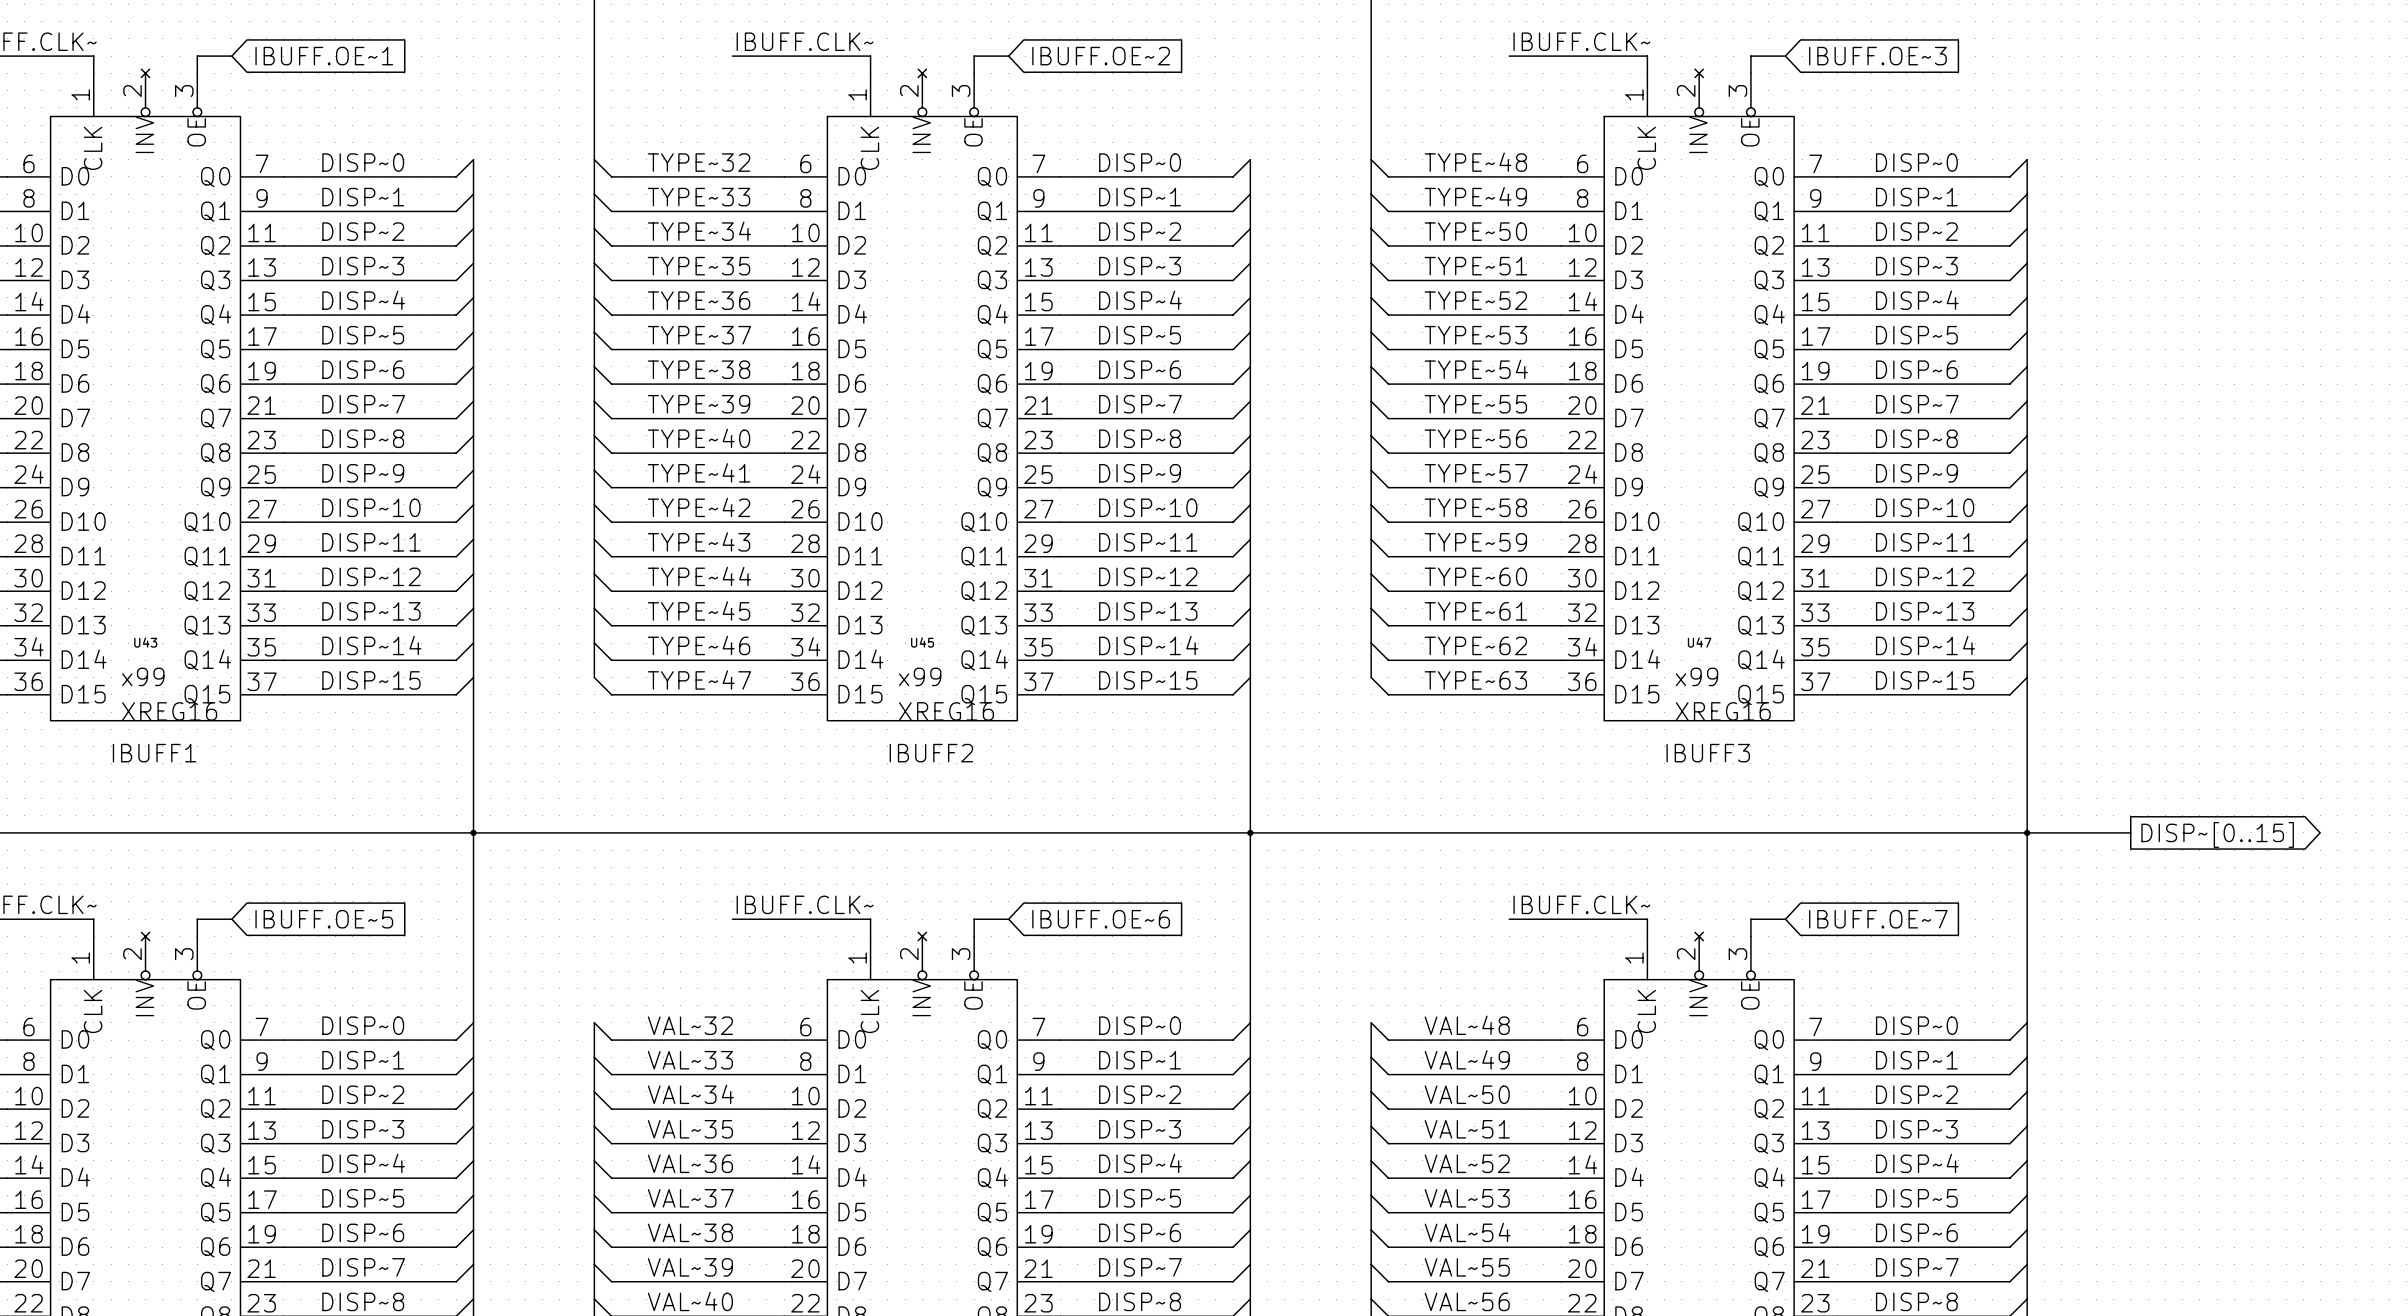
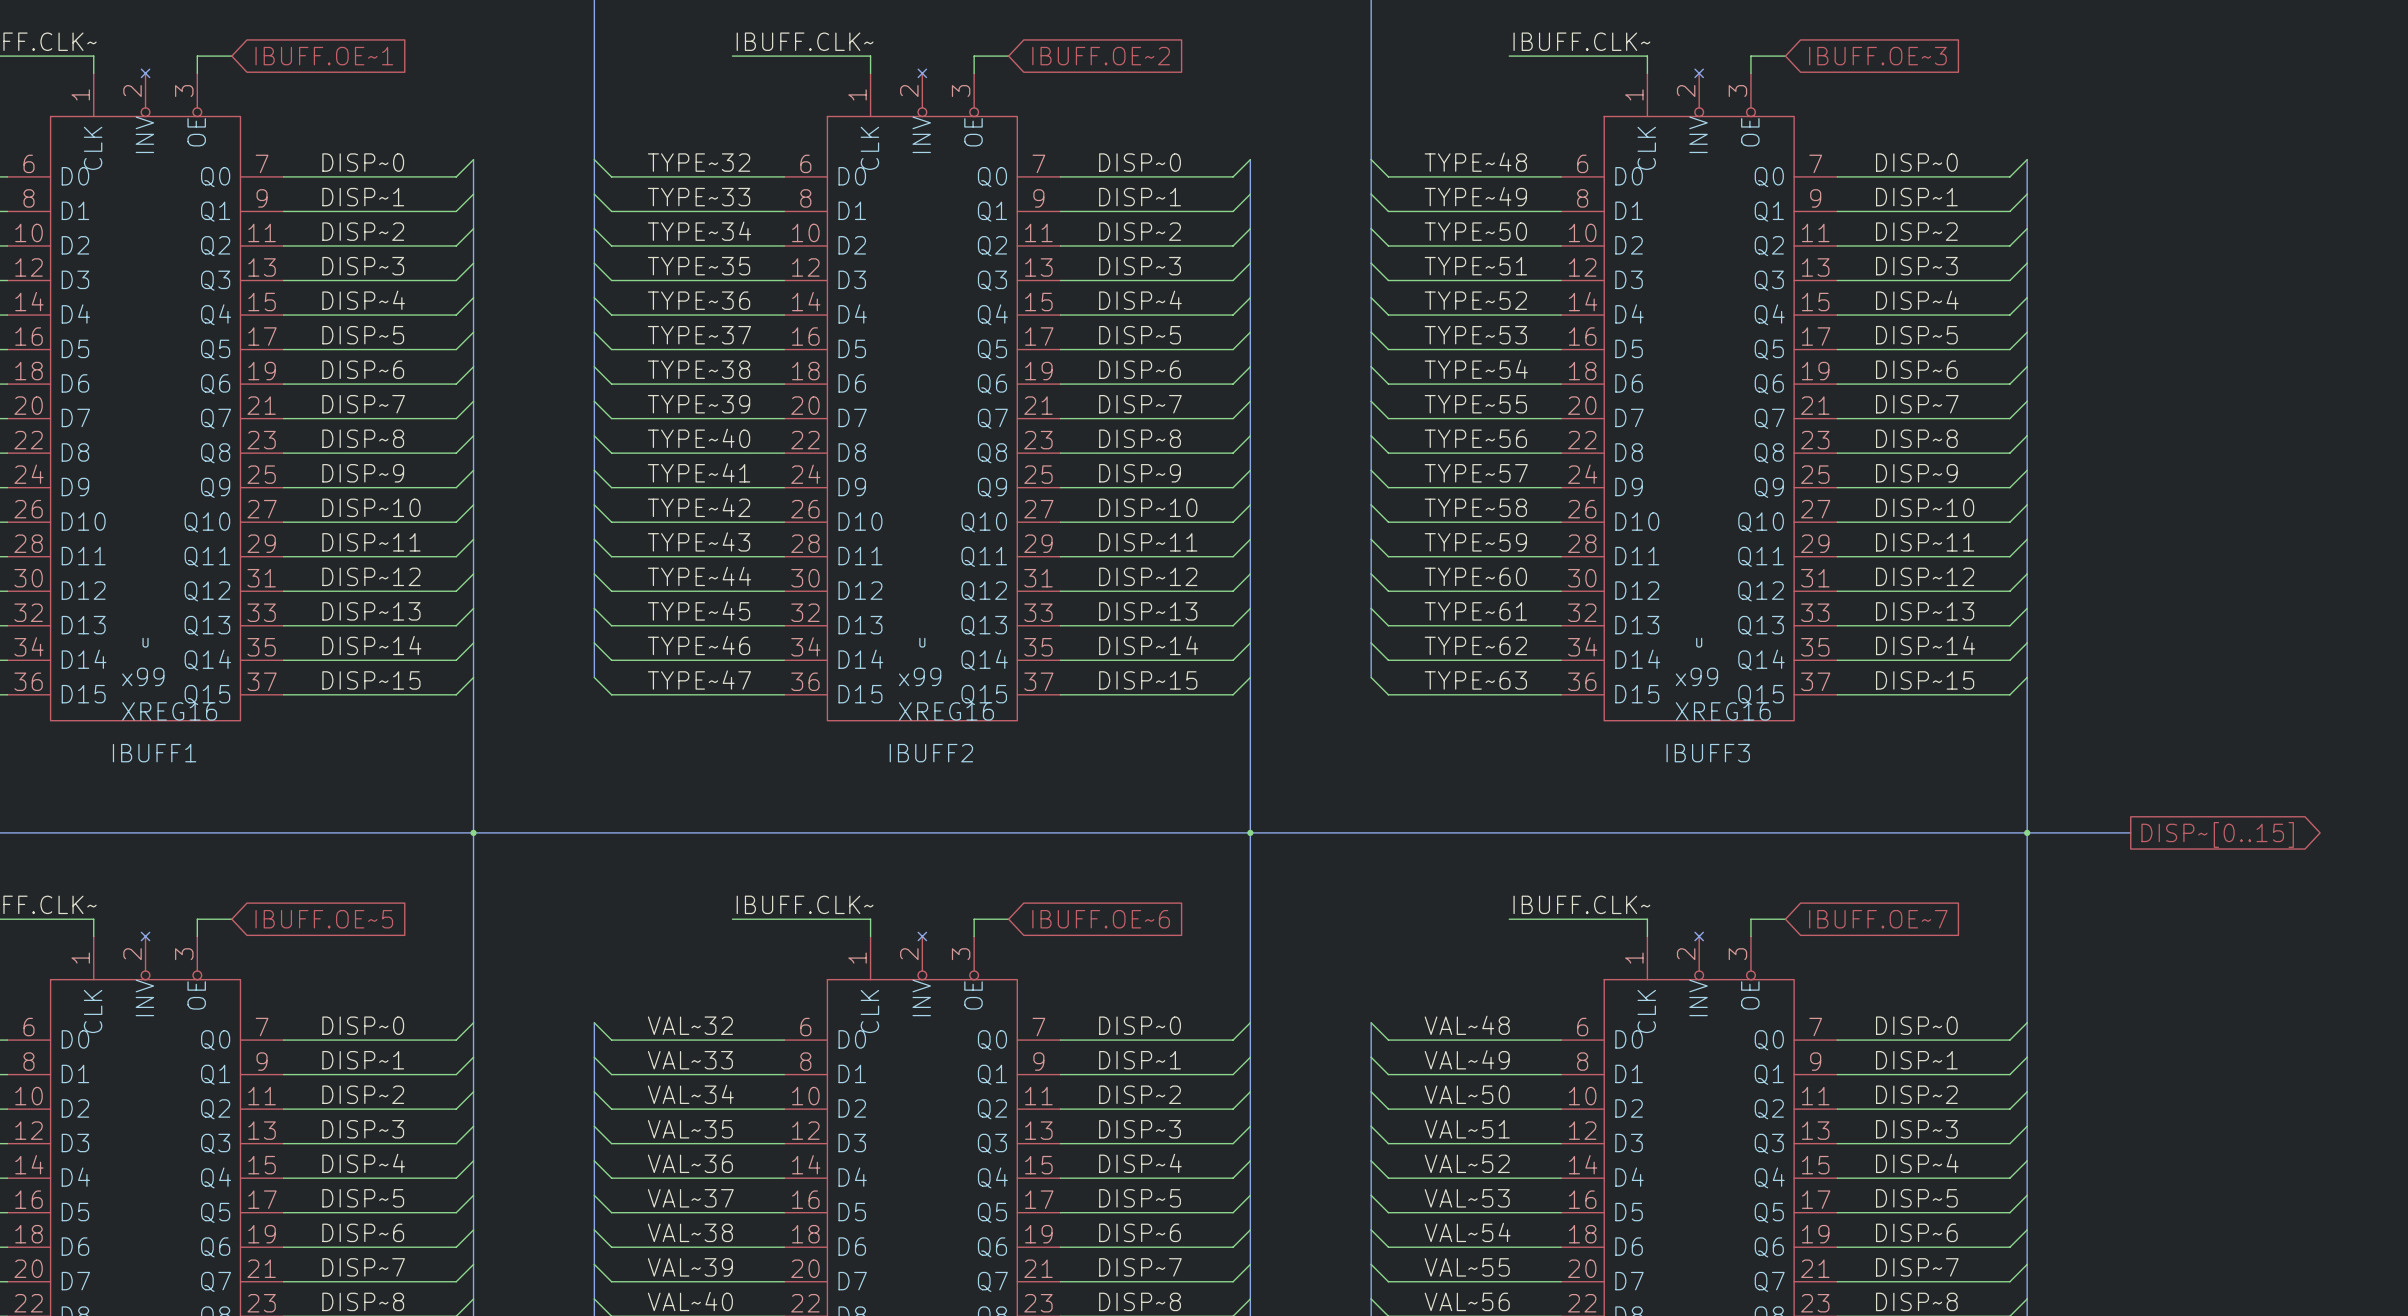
U43 name: U43 (145, 642) -> U (145, 642)
U45 name: U45 (922, 642) -> U (922, 642)
U47 name: U47 (1699, 642) -> U (1699, 642)

